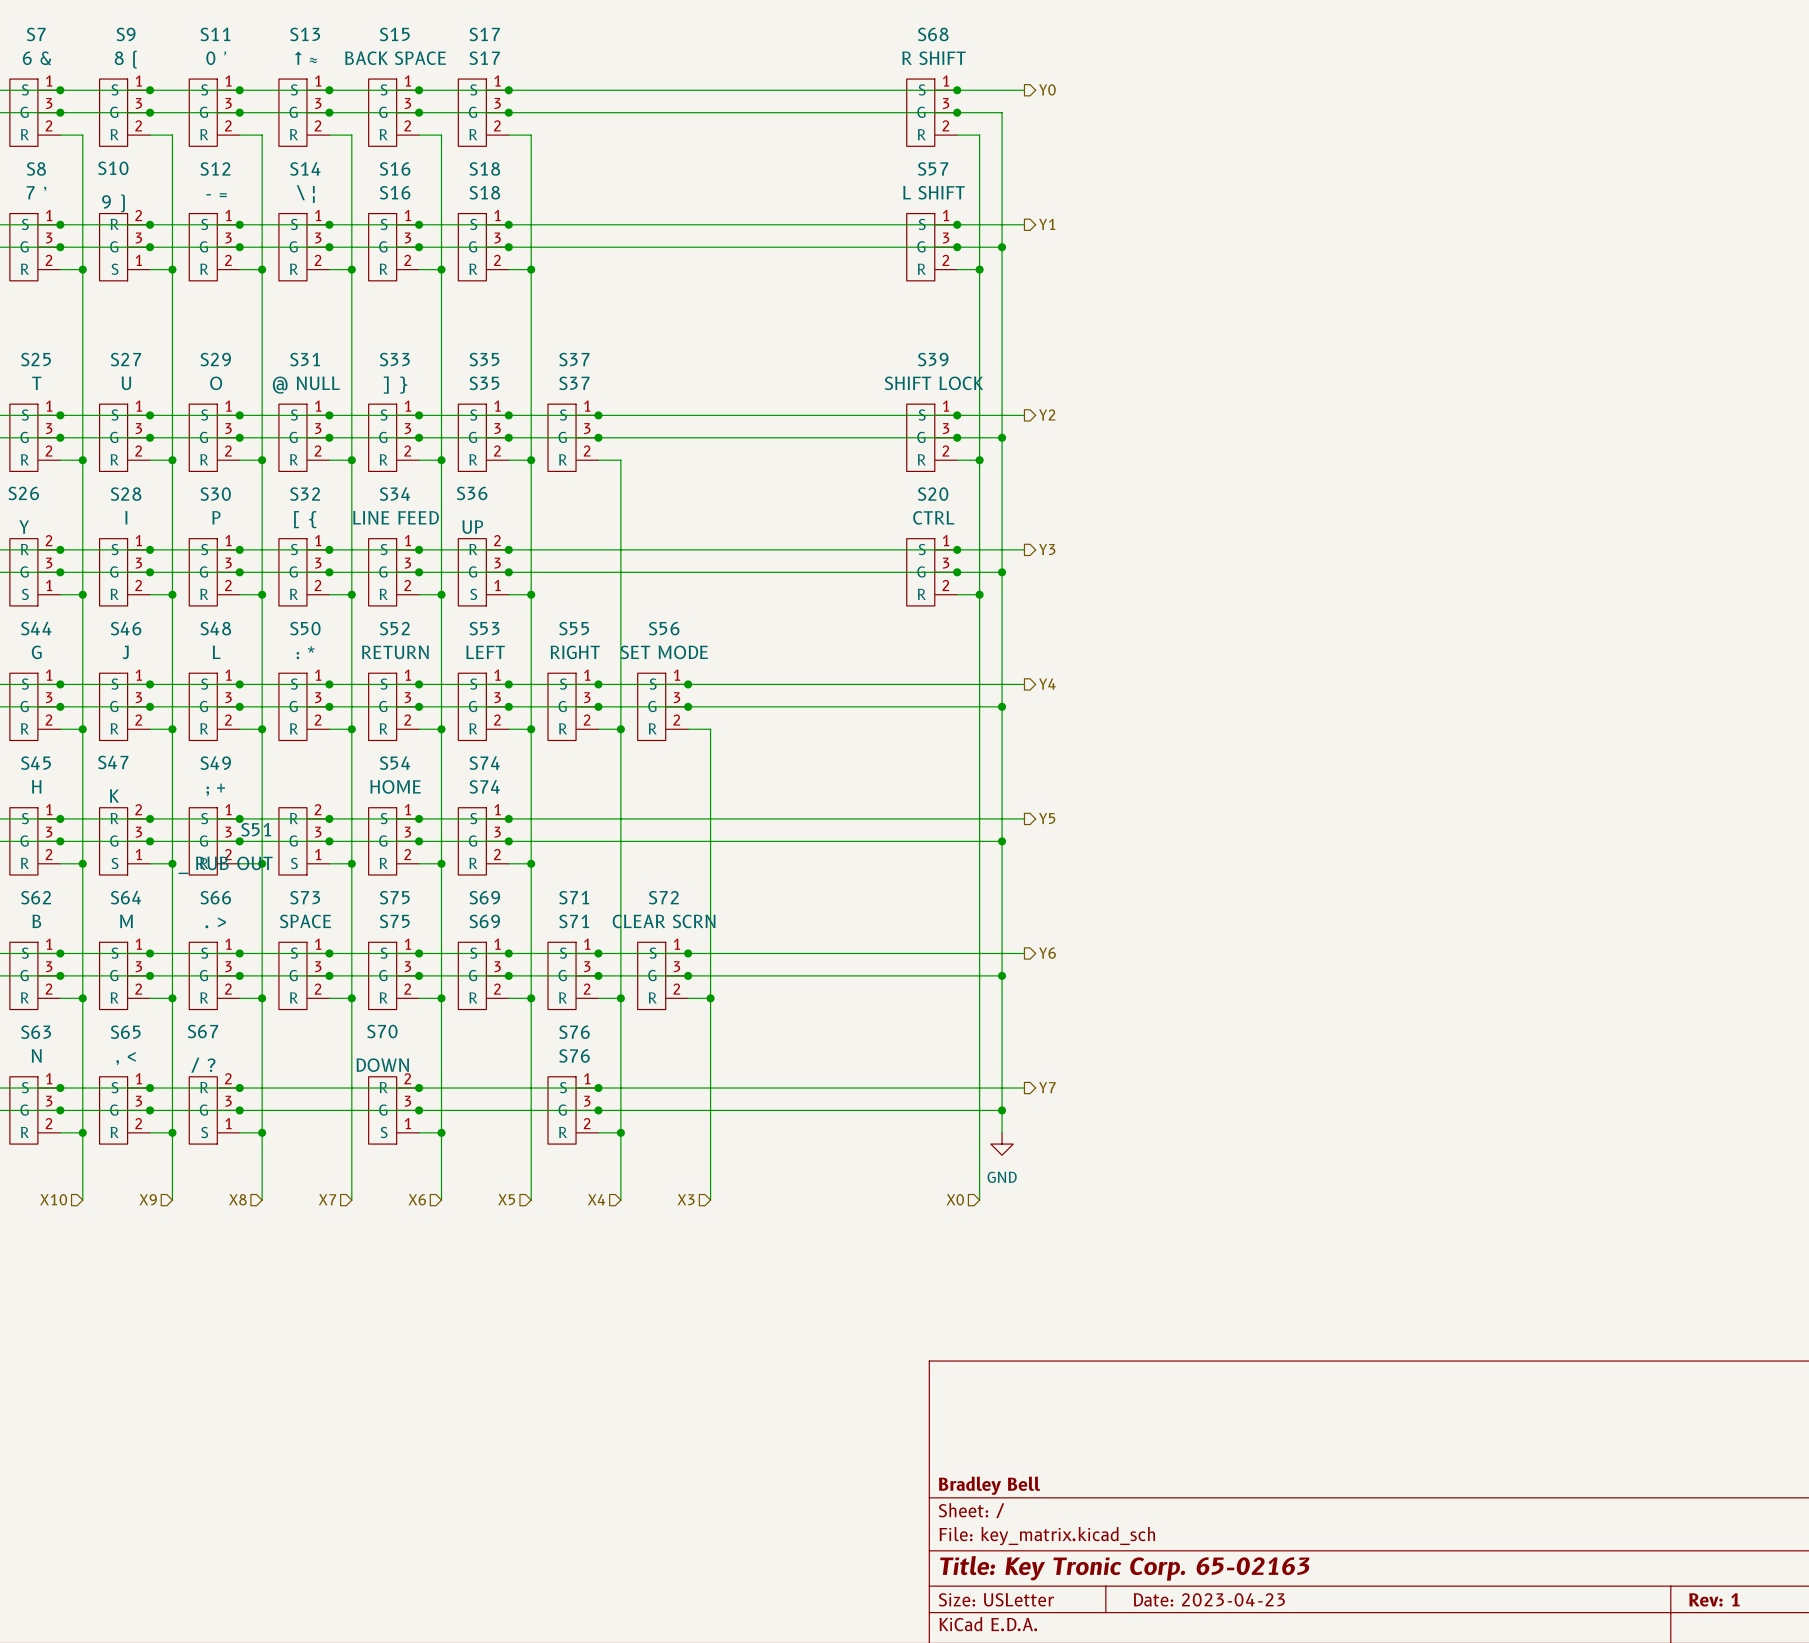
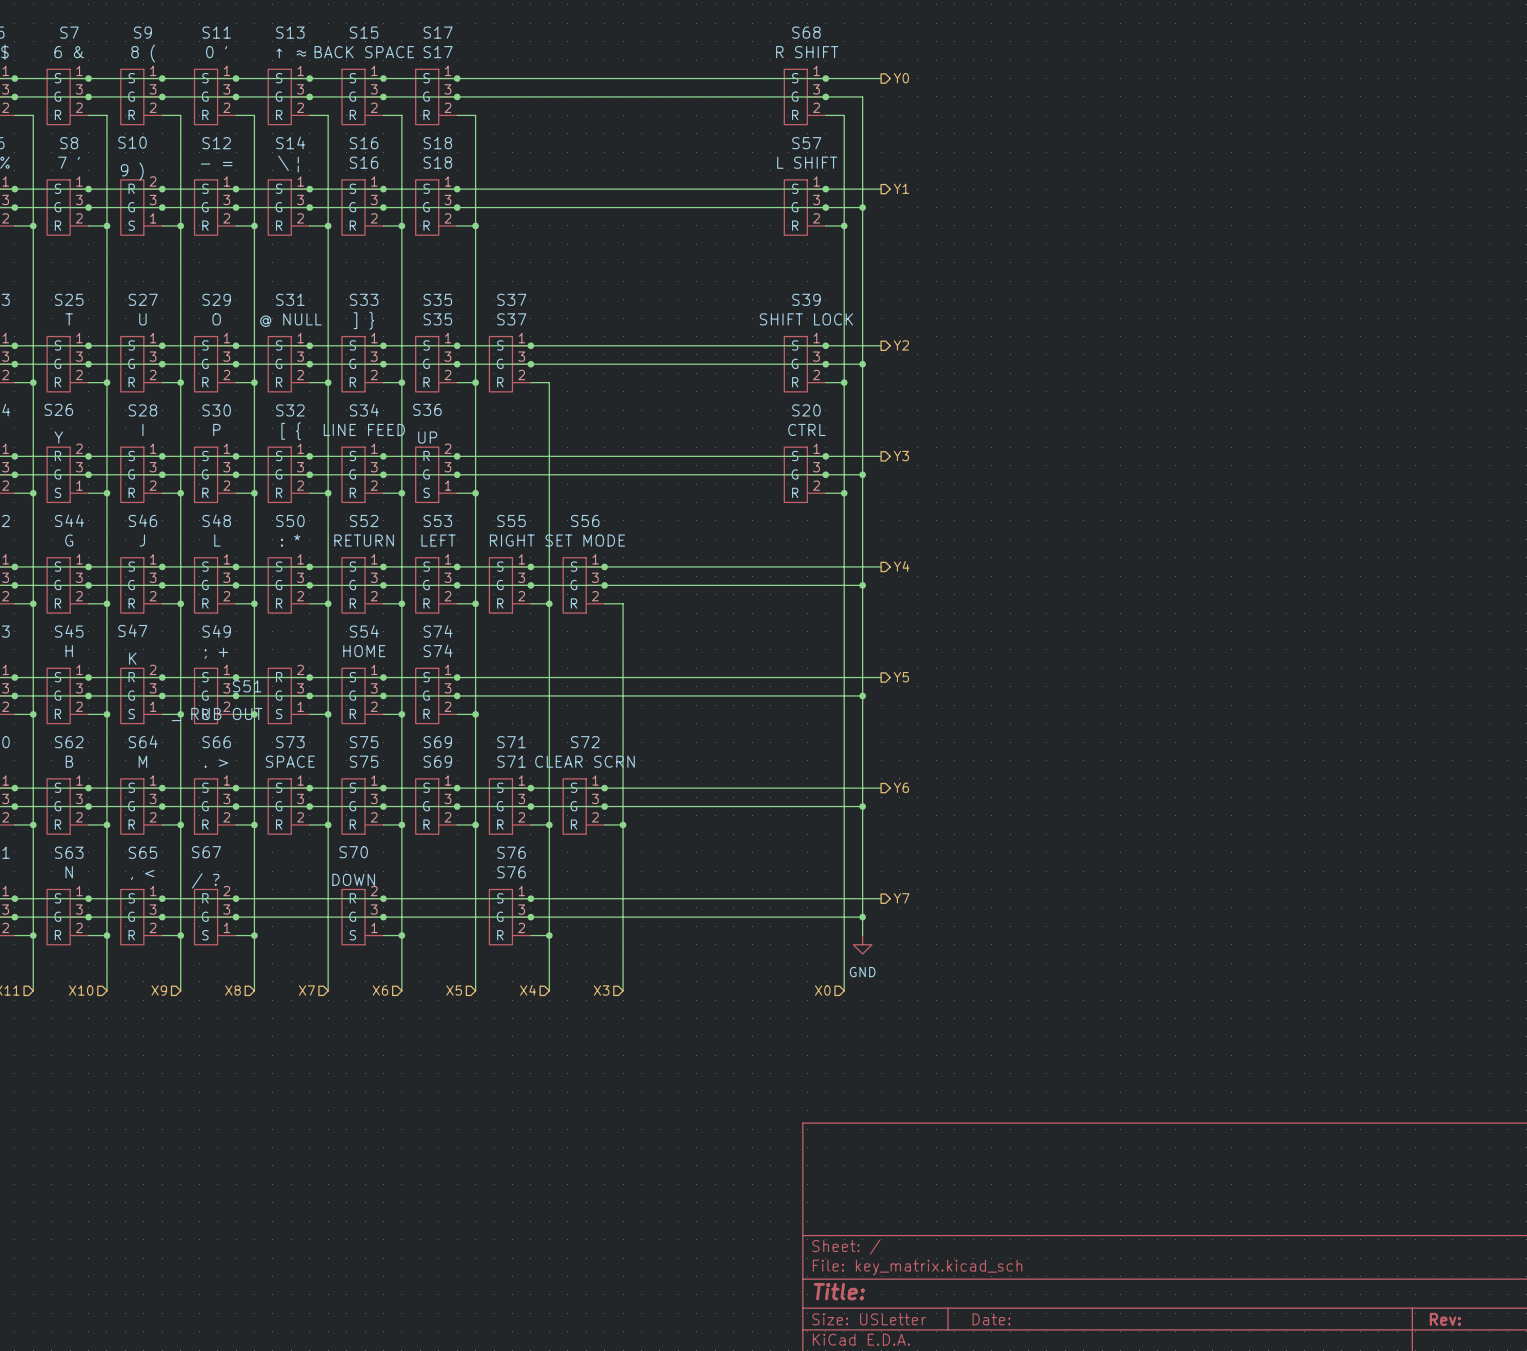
title block: Bradley Bell (989, 1485) -> none
title block: Title: Key Tronic Corp. 65-02163 (1124, 1568) -> Title: (839, 1291)
title block: Date: 2023-04-23 (1209, 1599) -> Date: (991, 1319)
title block: Rev: 1 (1714, 1599) -> Rev: (1445, 1319)

